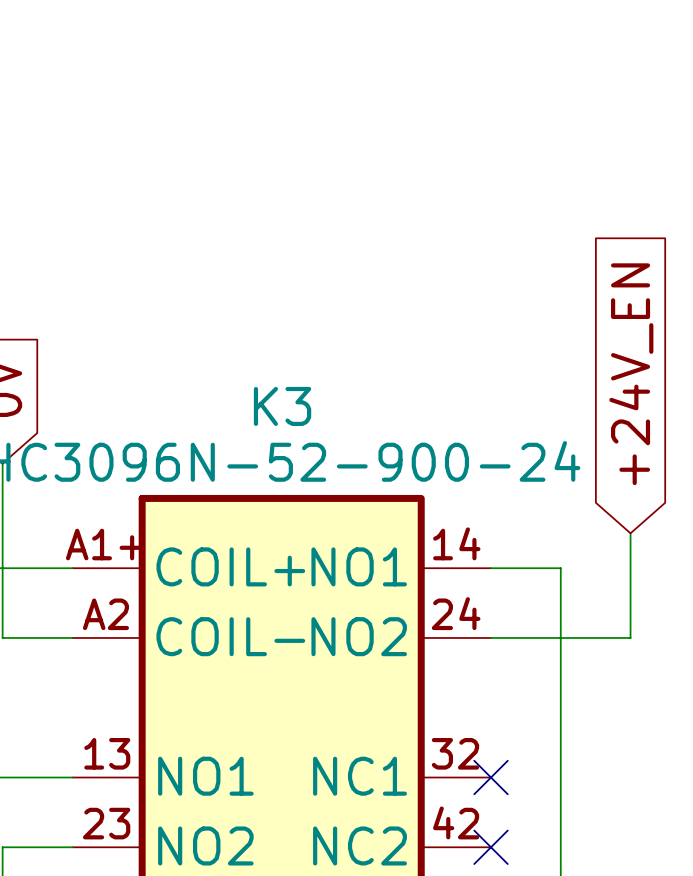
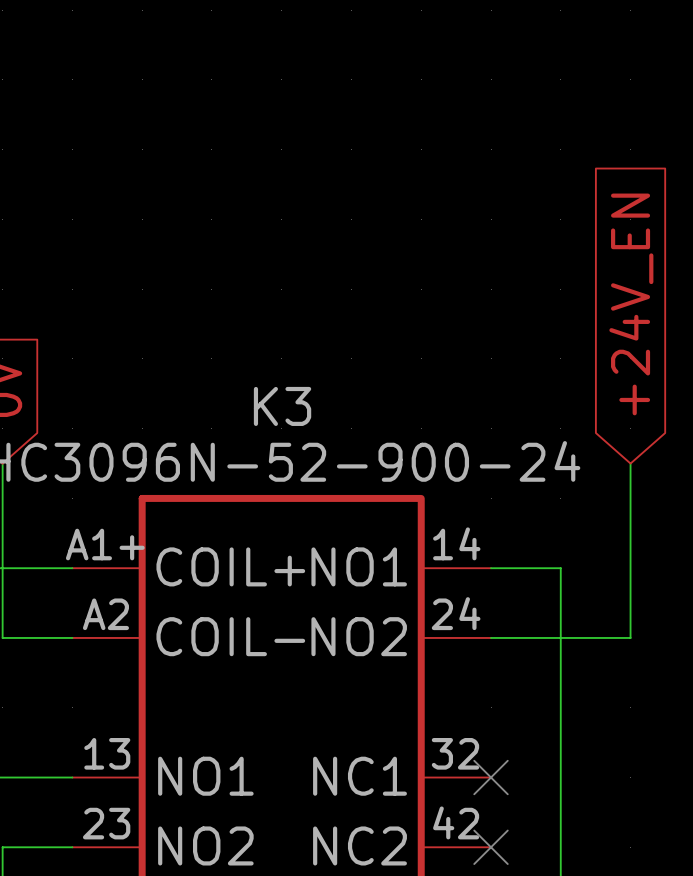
global label position: +24V_EN (631, 374) -> +24V_EN (631, 304)
wire: none -> (630, 463) (630, 533)

